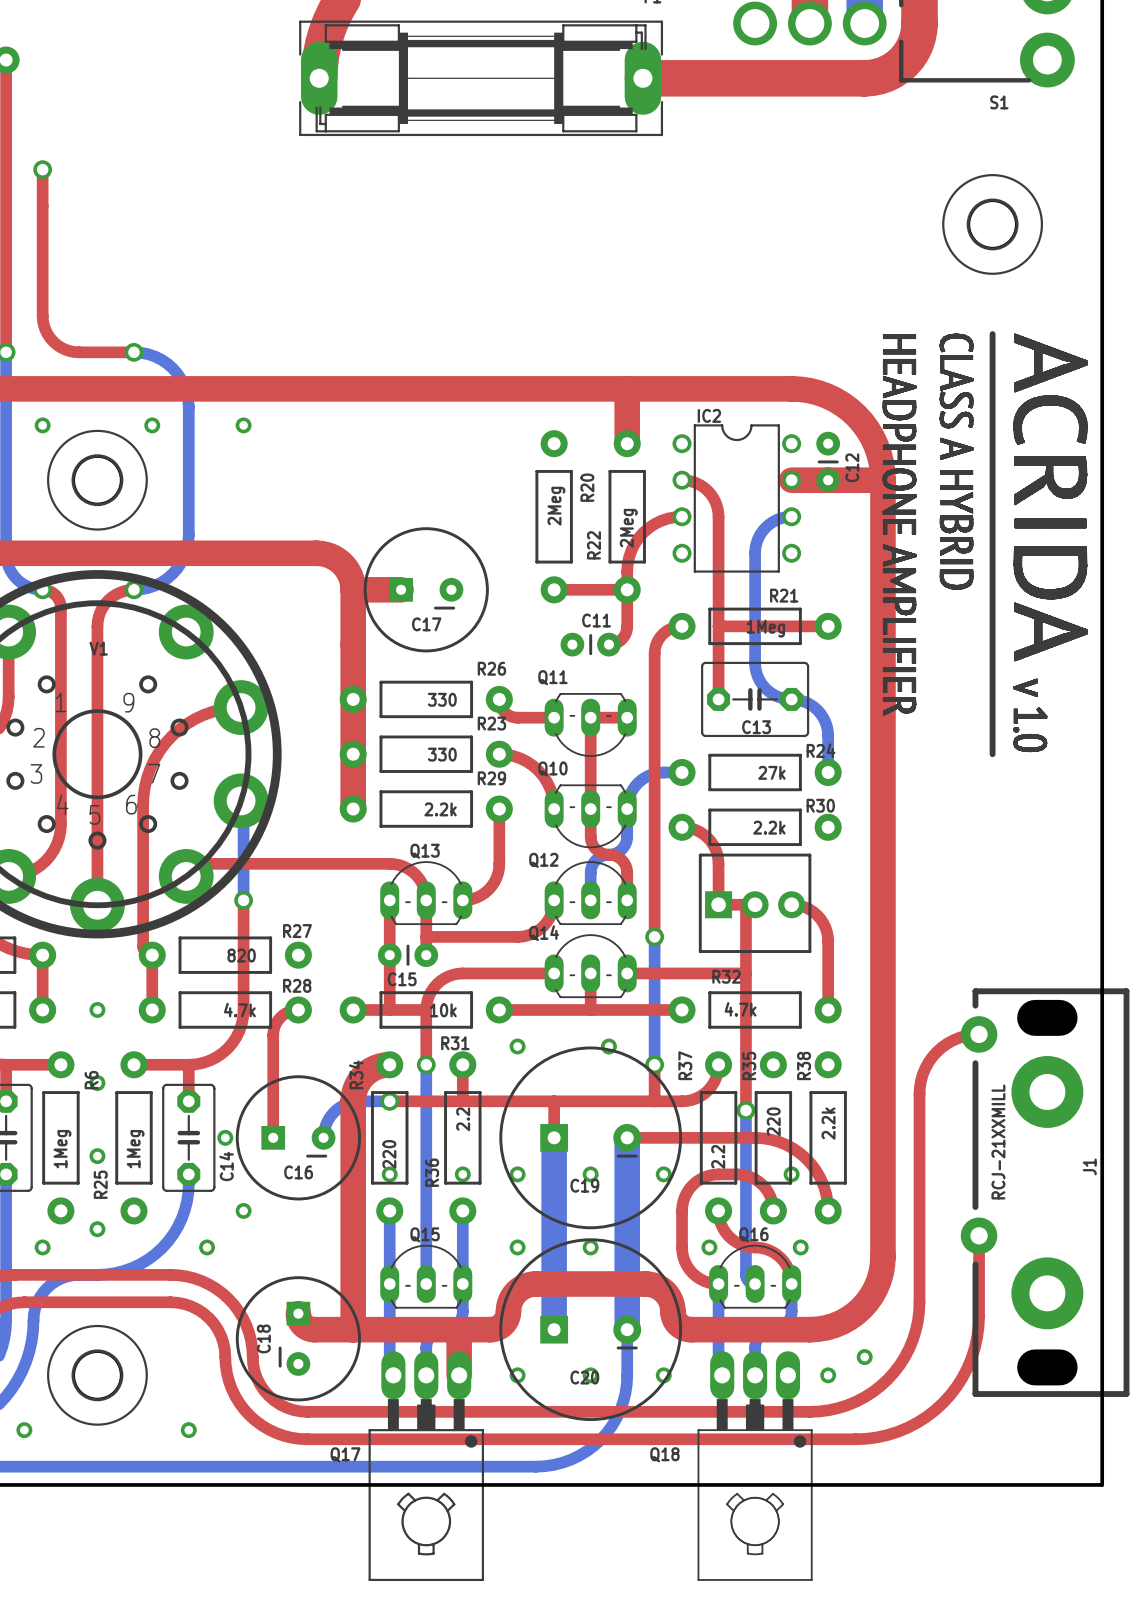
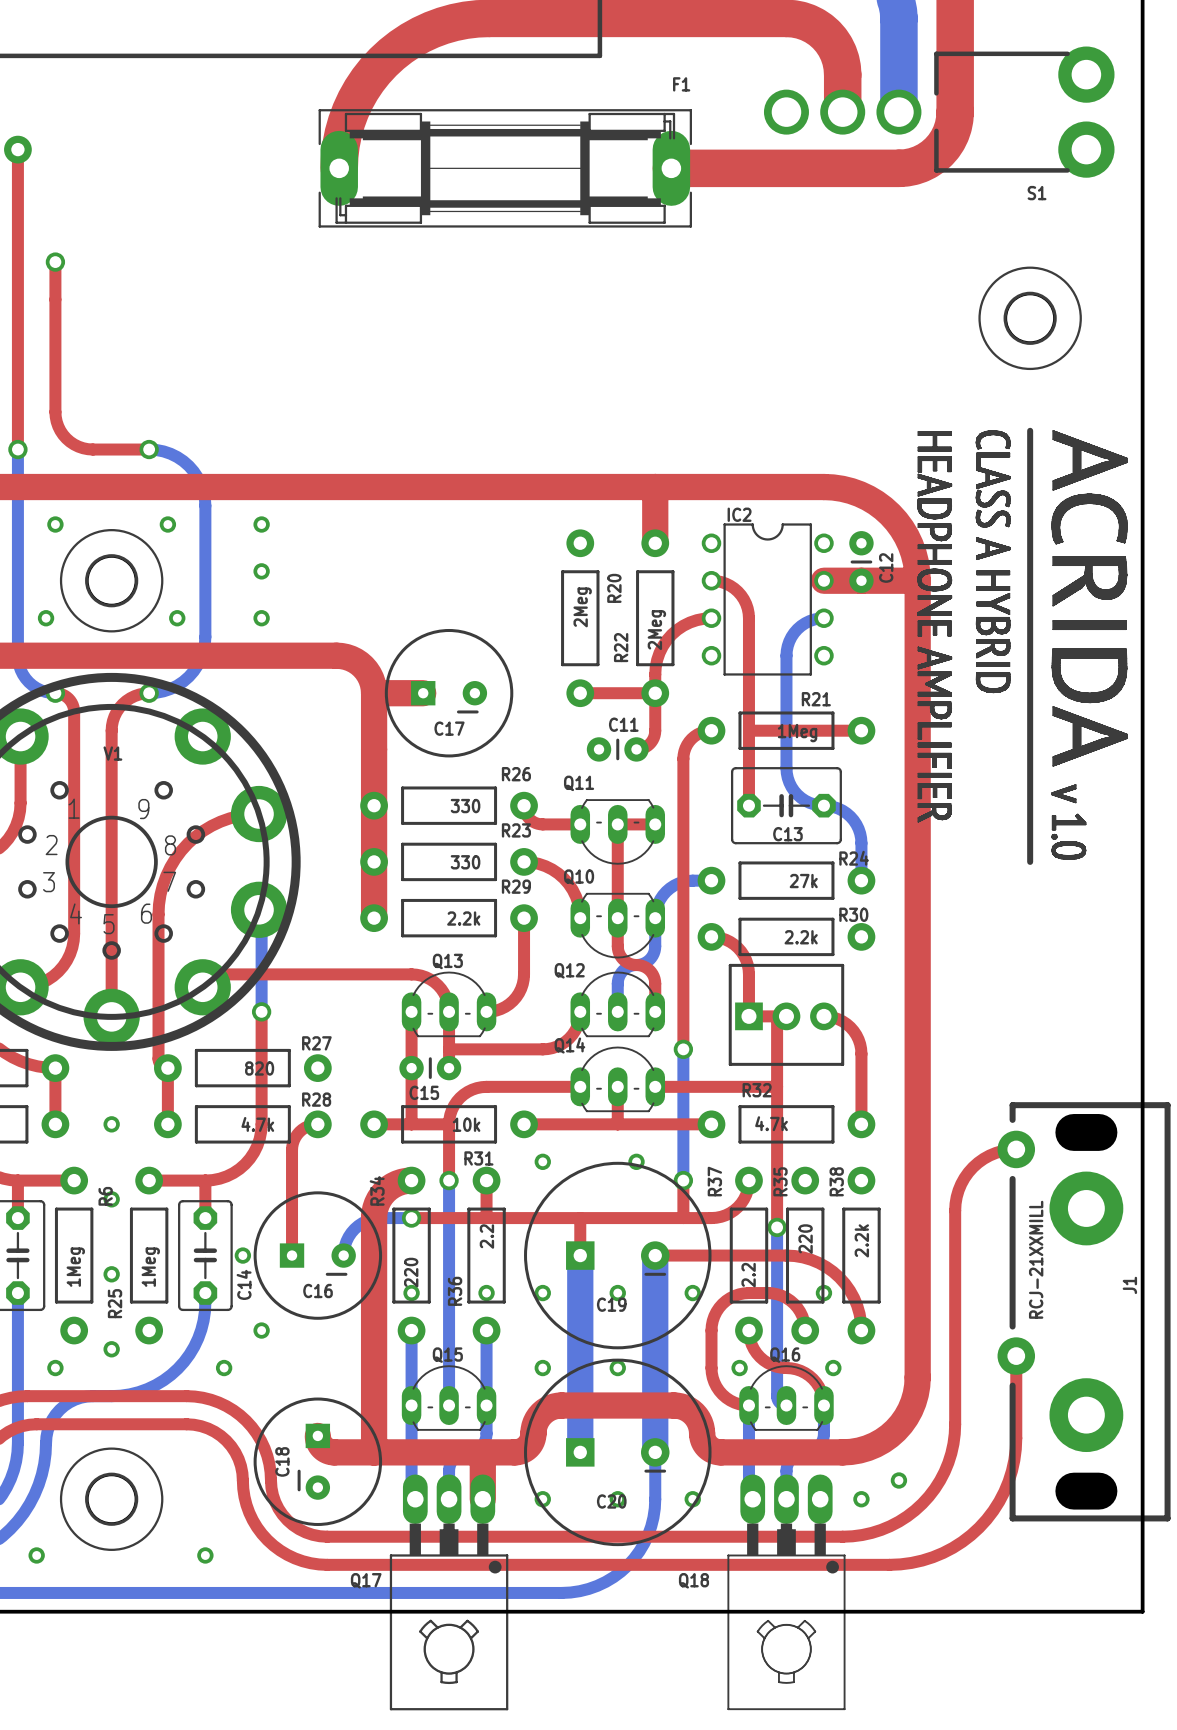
via: none -> (261, 571)
via: none -> (46, 618)
via: none -> (177, 618)
via: none -> (261, 618)

